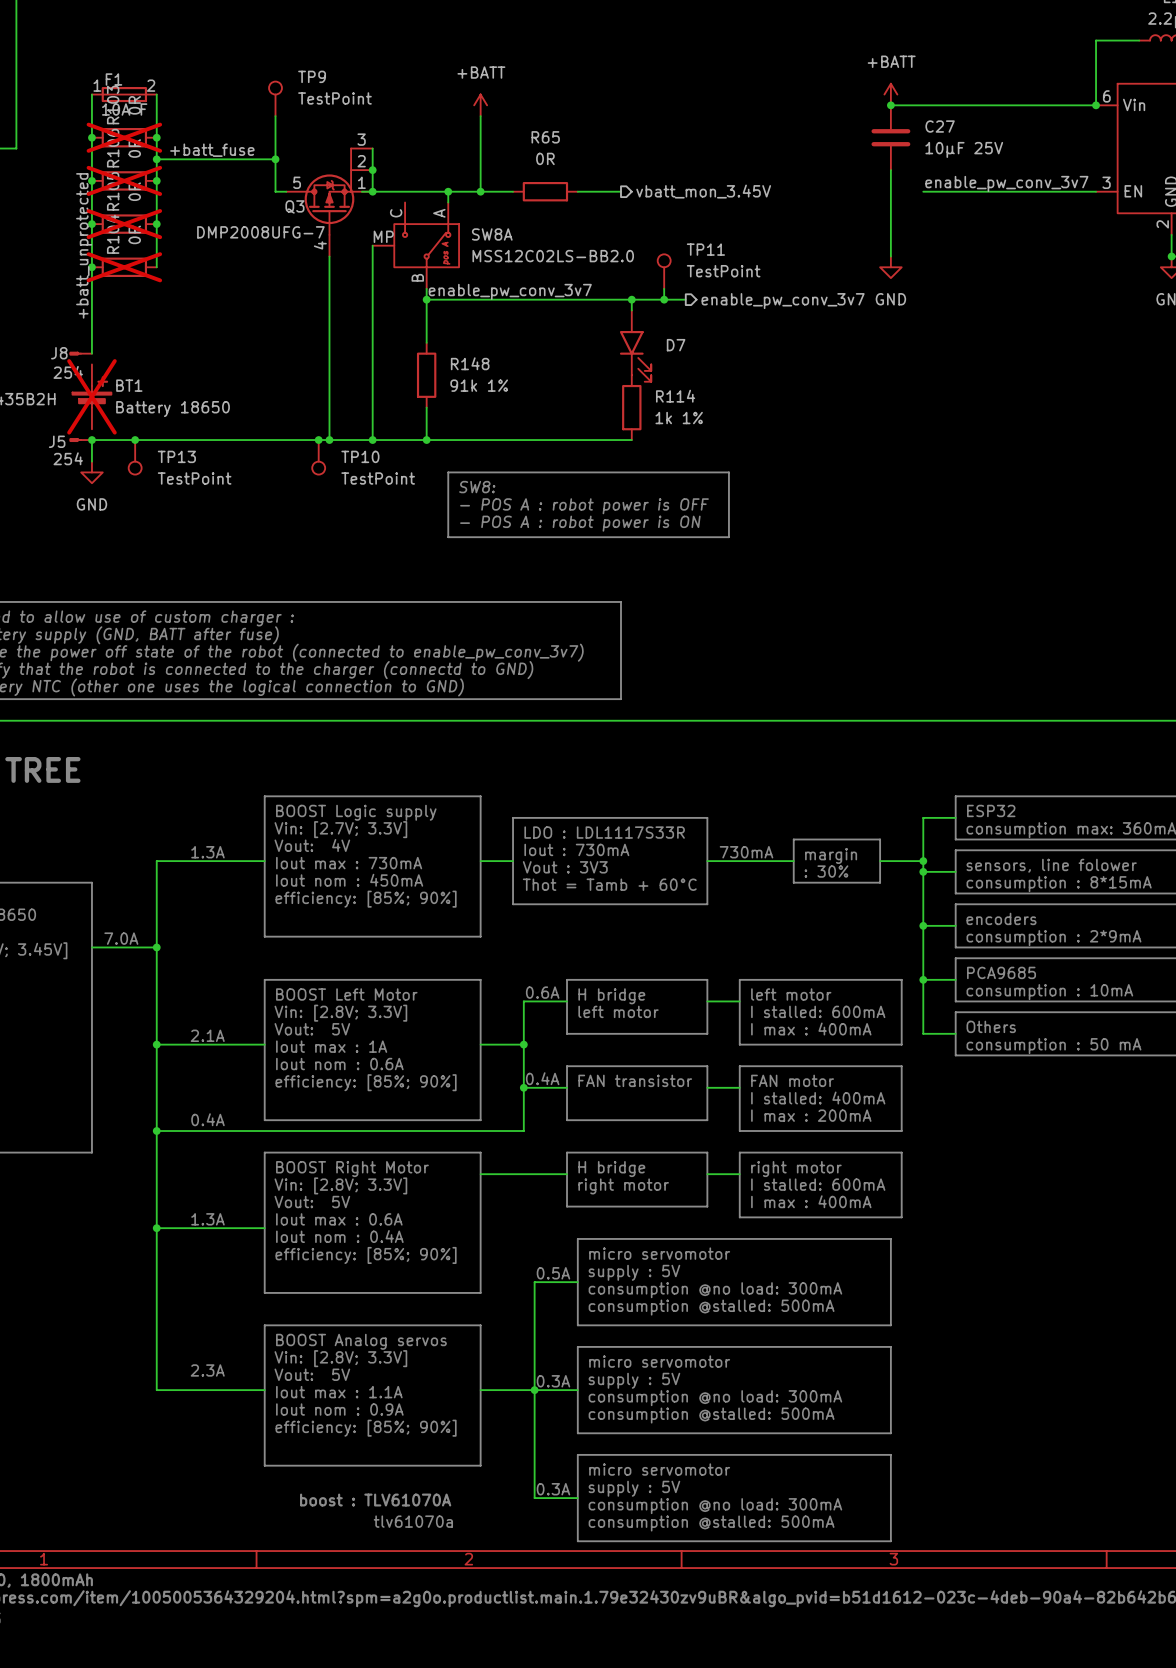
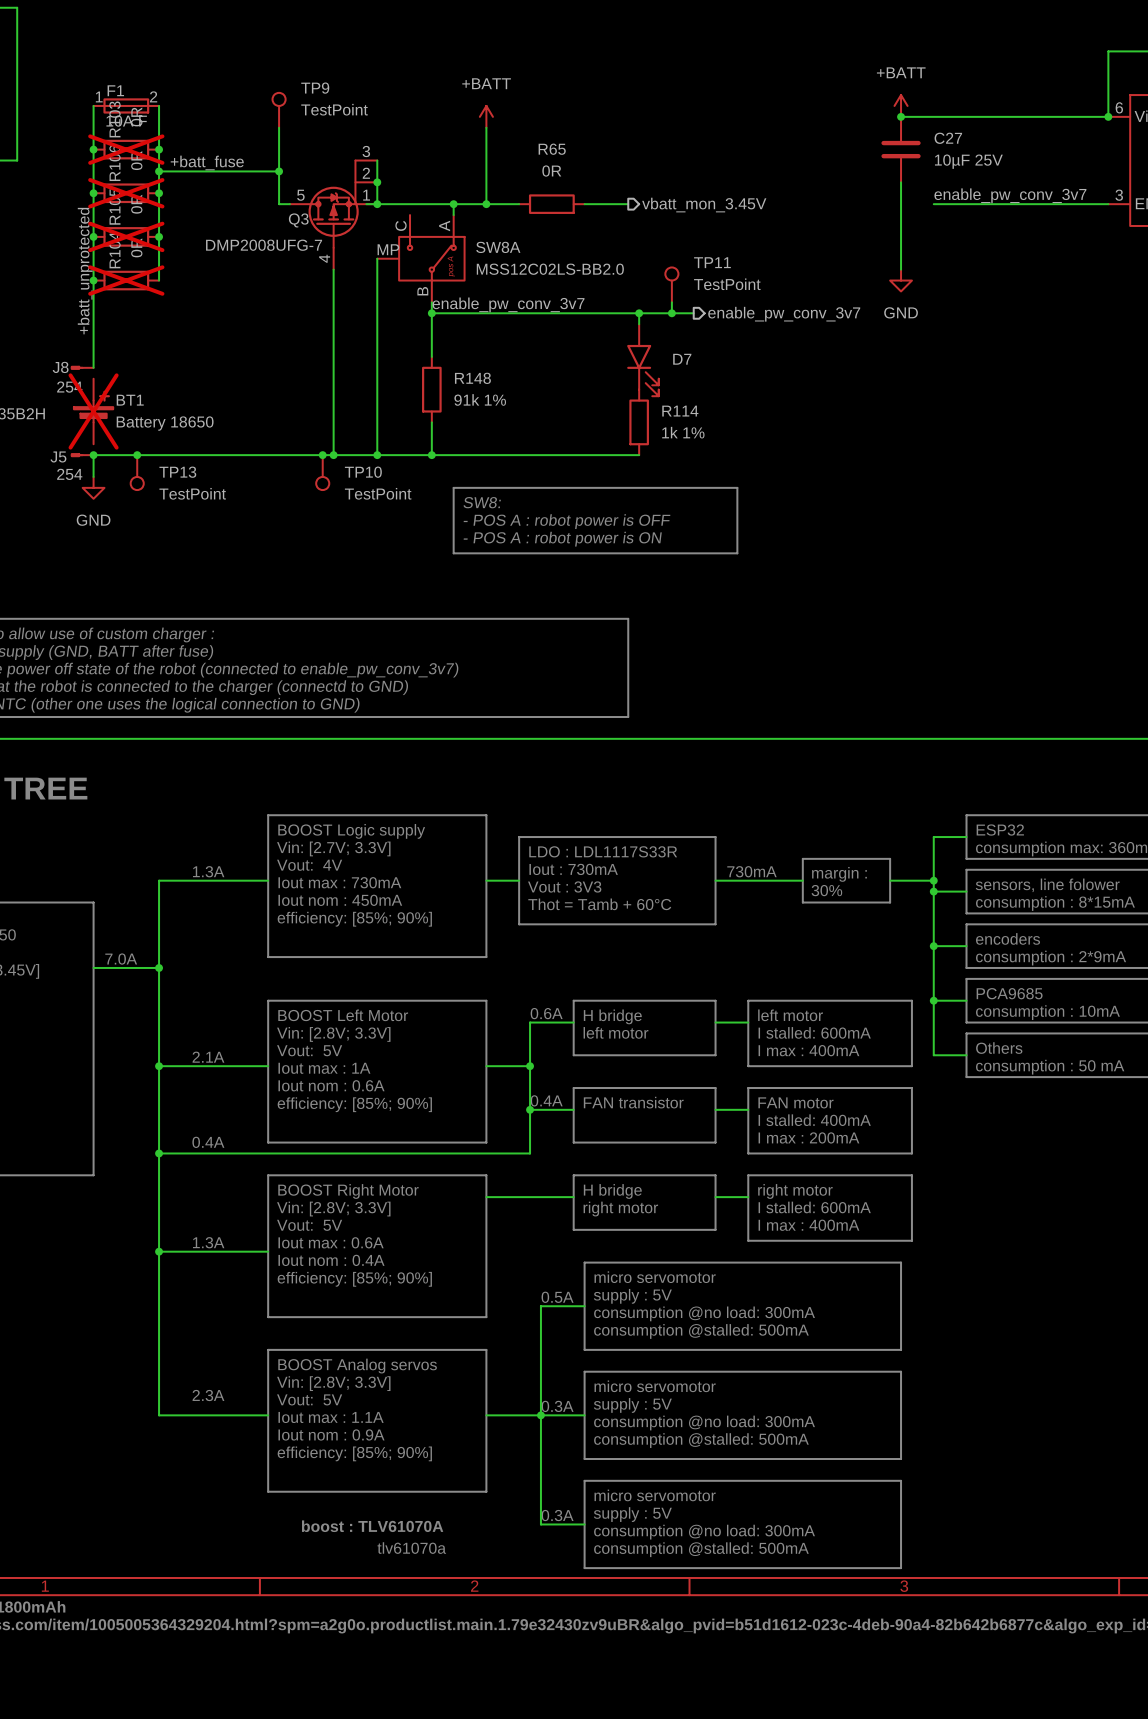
text: margin (831, 855) -> margin : (839, 874)
text: : 30% (826, 871) -> 30% (826, 890)

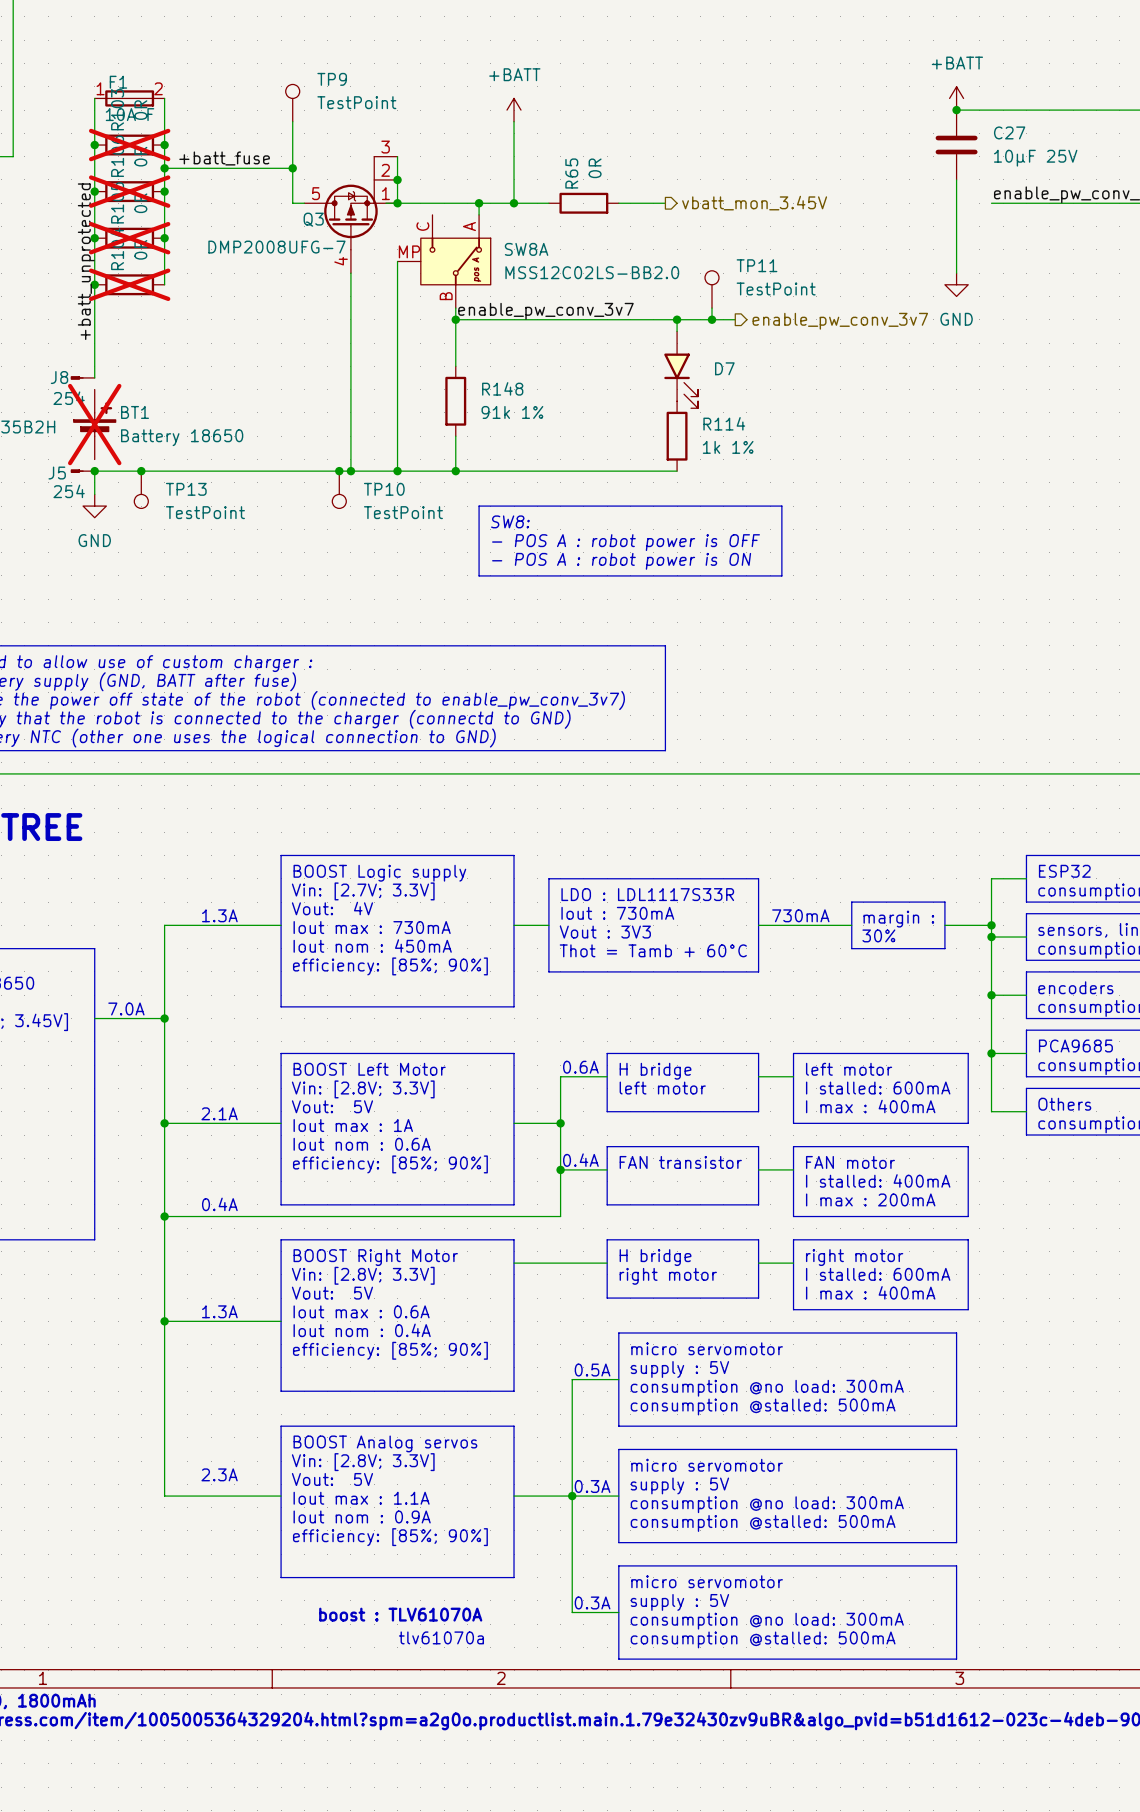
R65 name rotation: 0° (552, 149) -> 90° counterclockwise (571, 173)
R65 value rotation: 0° (551, 171) -> 90° counterclockwise (595, 168)

